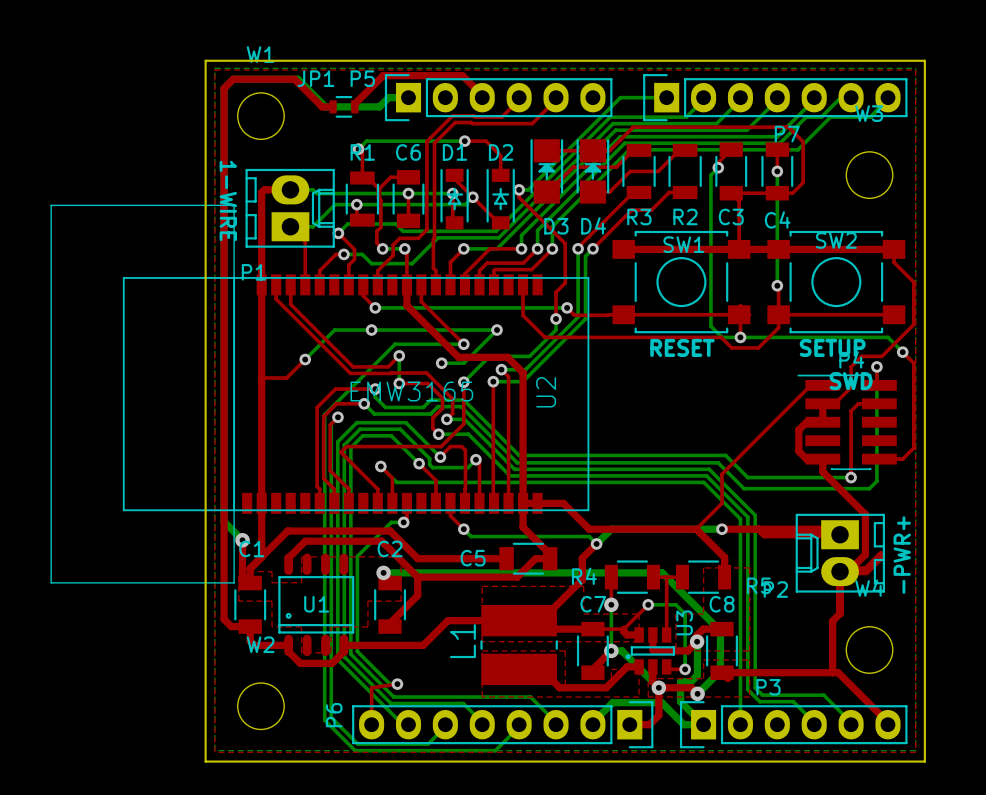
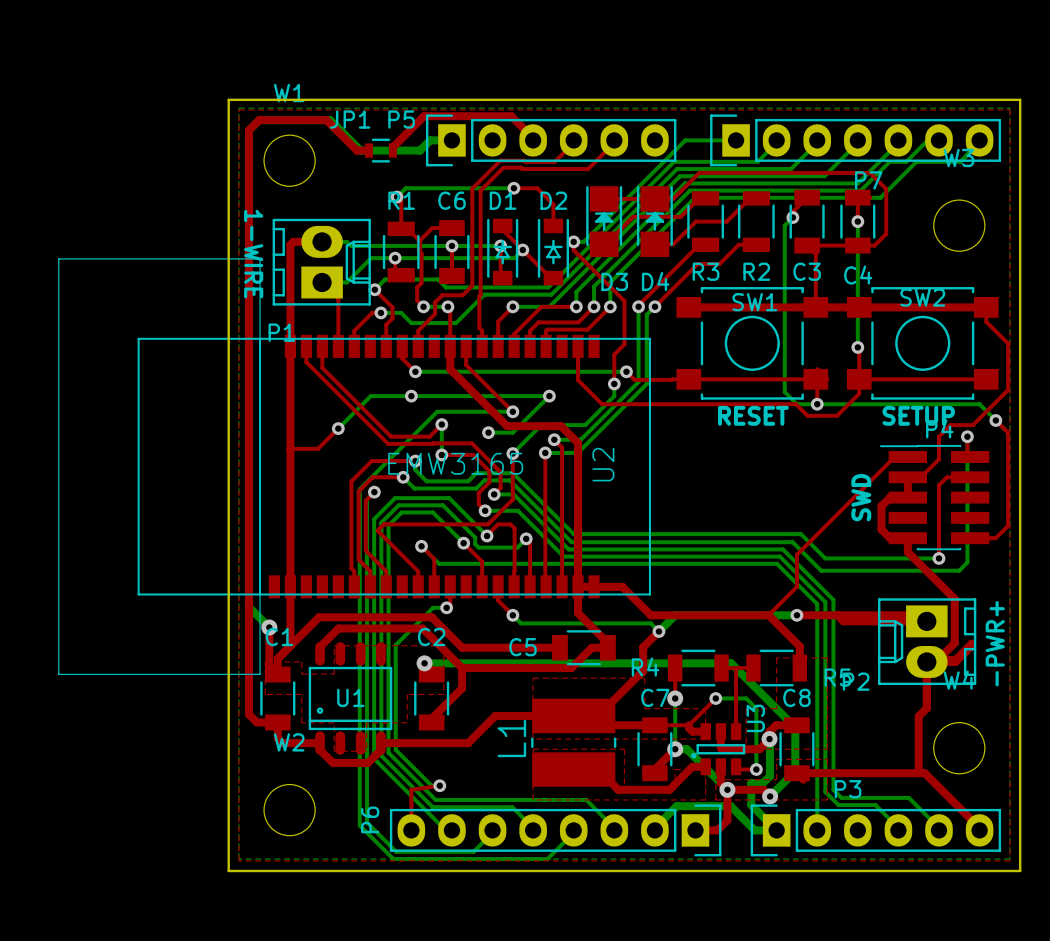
text rotation: 0° (851, 381) -> 90° counterclockwise (861, 497)
text position: SWD (851, 381) -> SWD (861, 497)

